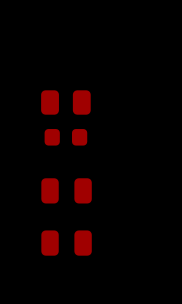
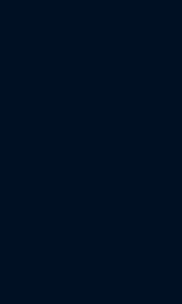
part: (65, 102) -> none
part: (65, 137) -> none
part: (66, 190) -> none
part: (66, 243) -> none

